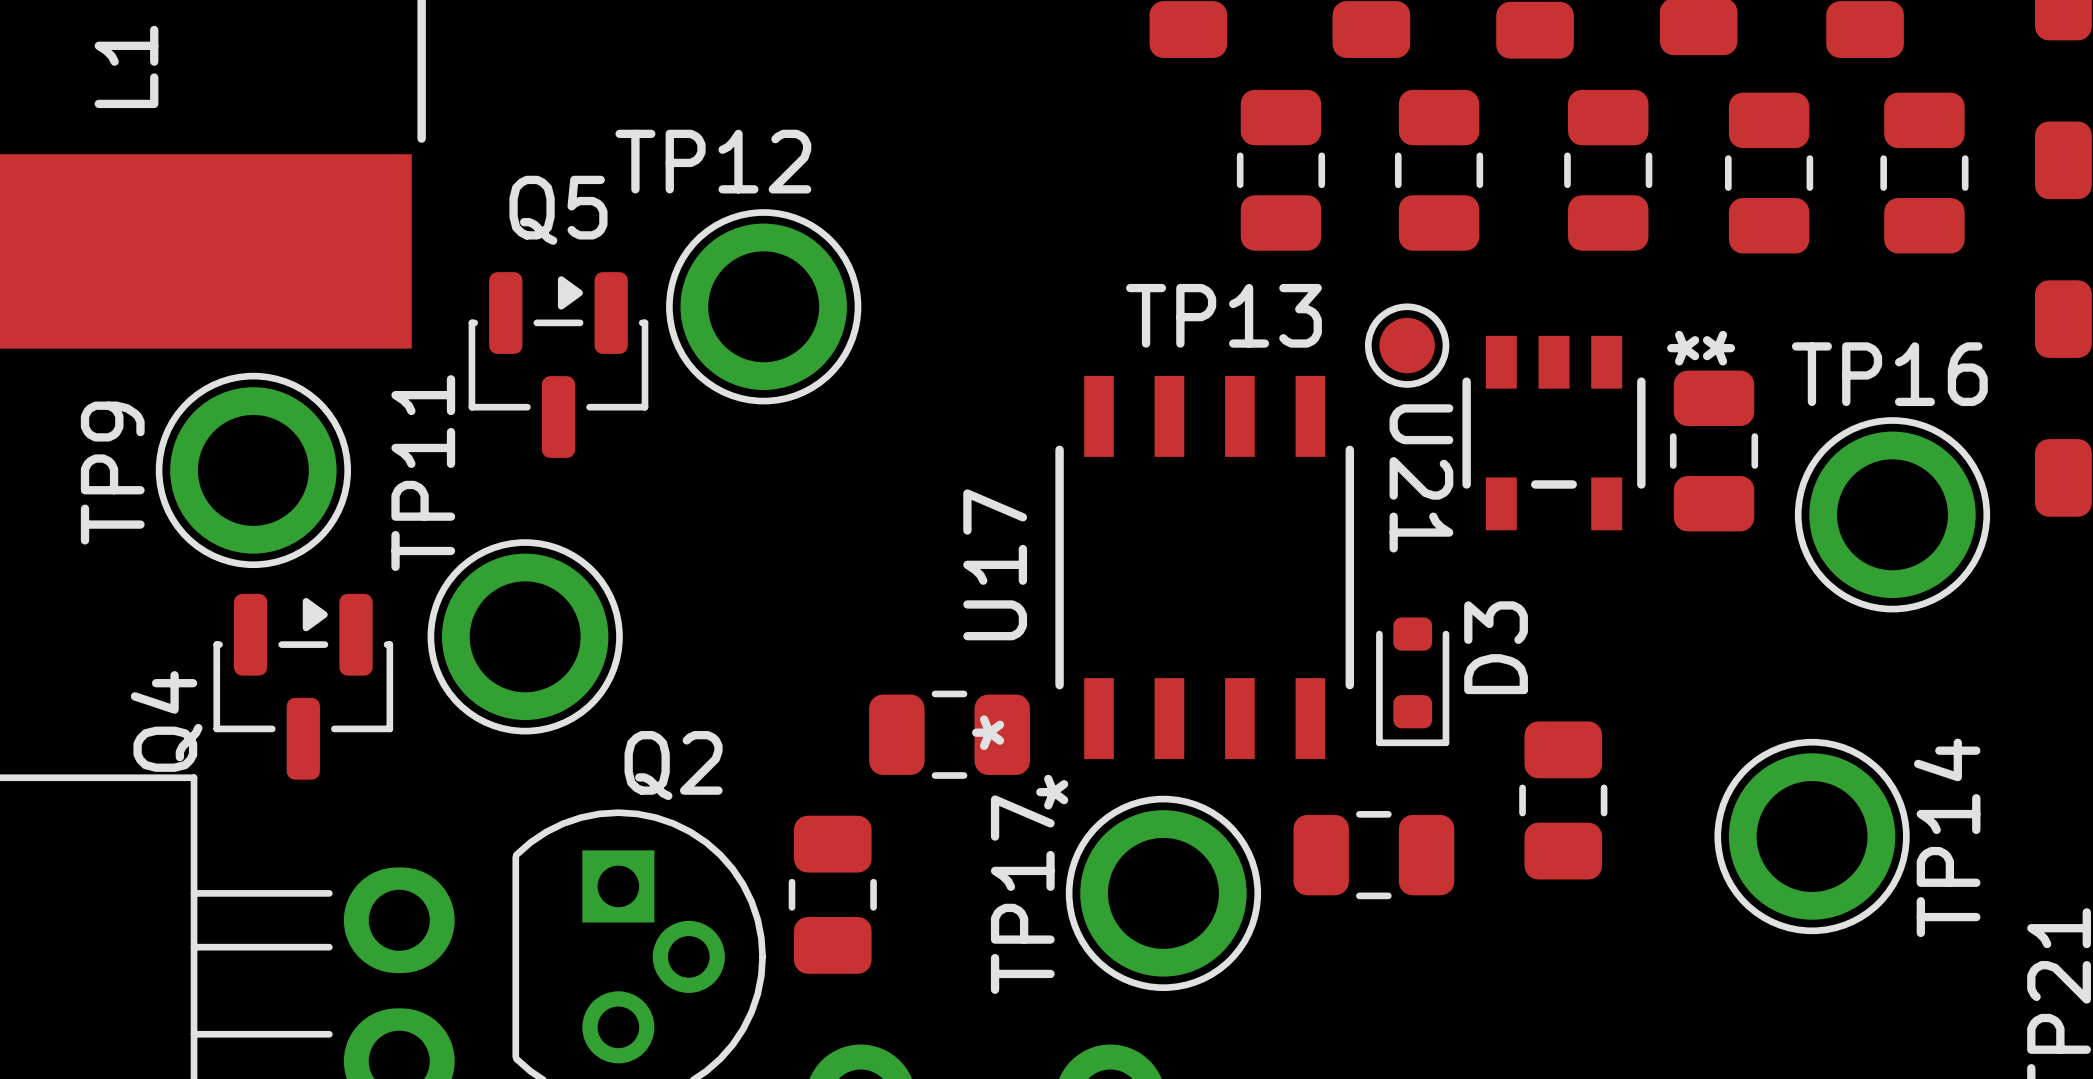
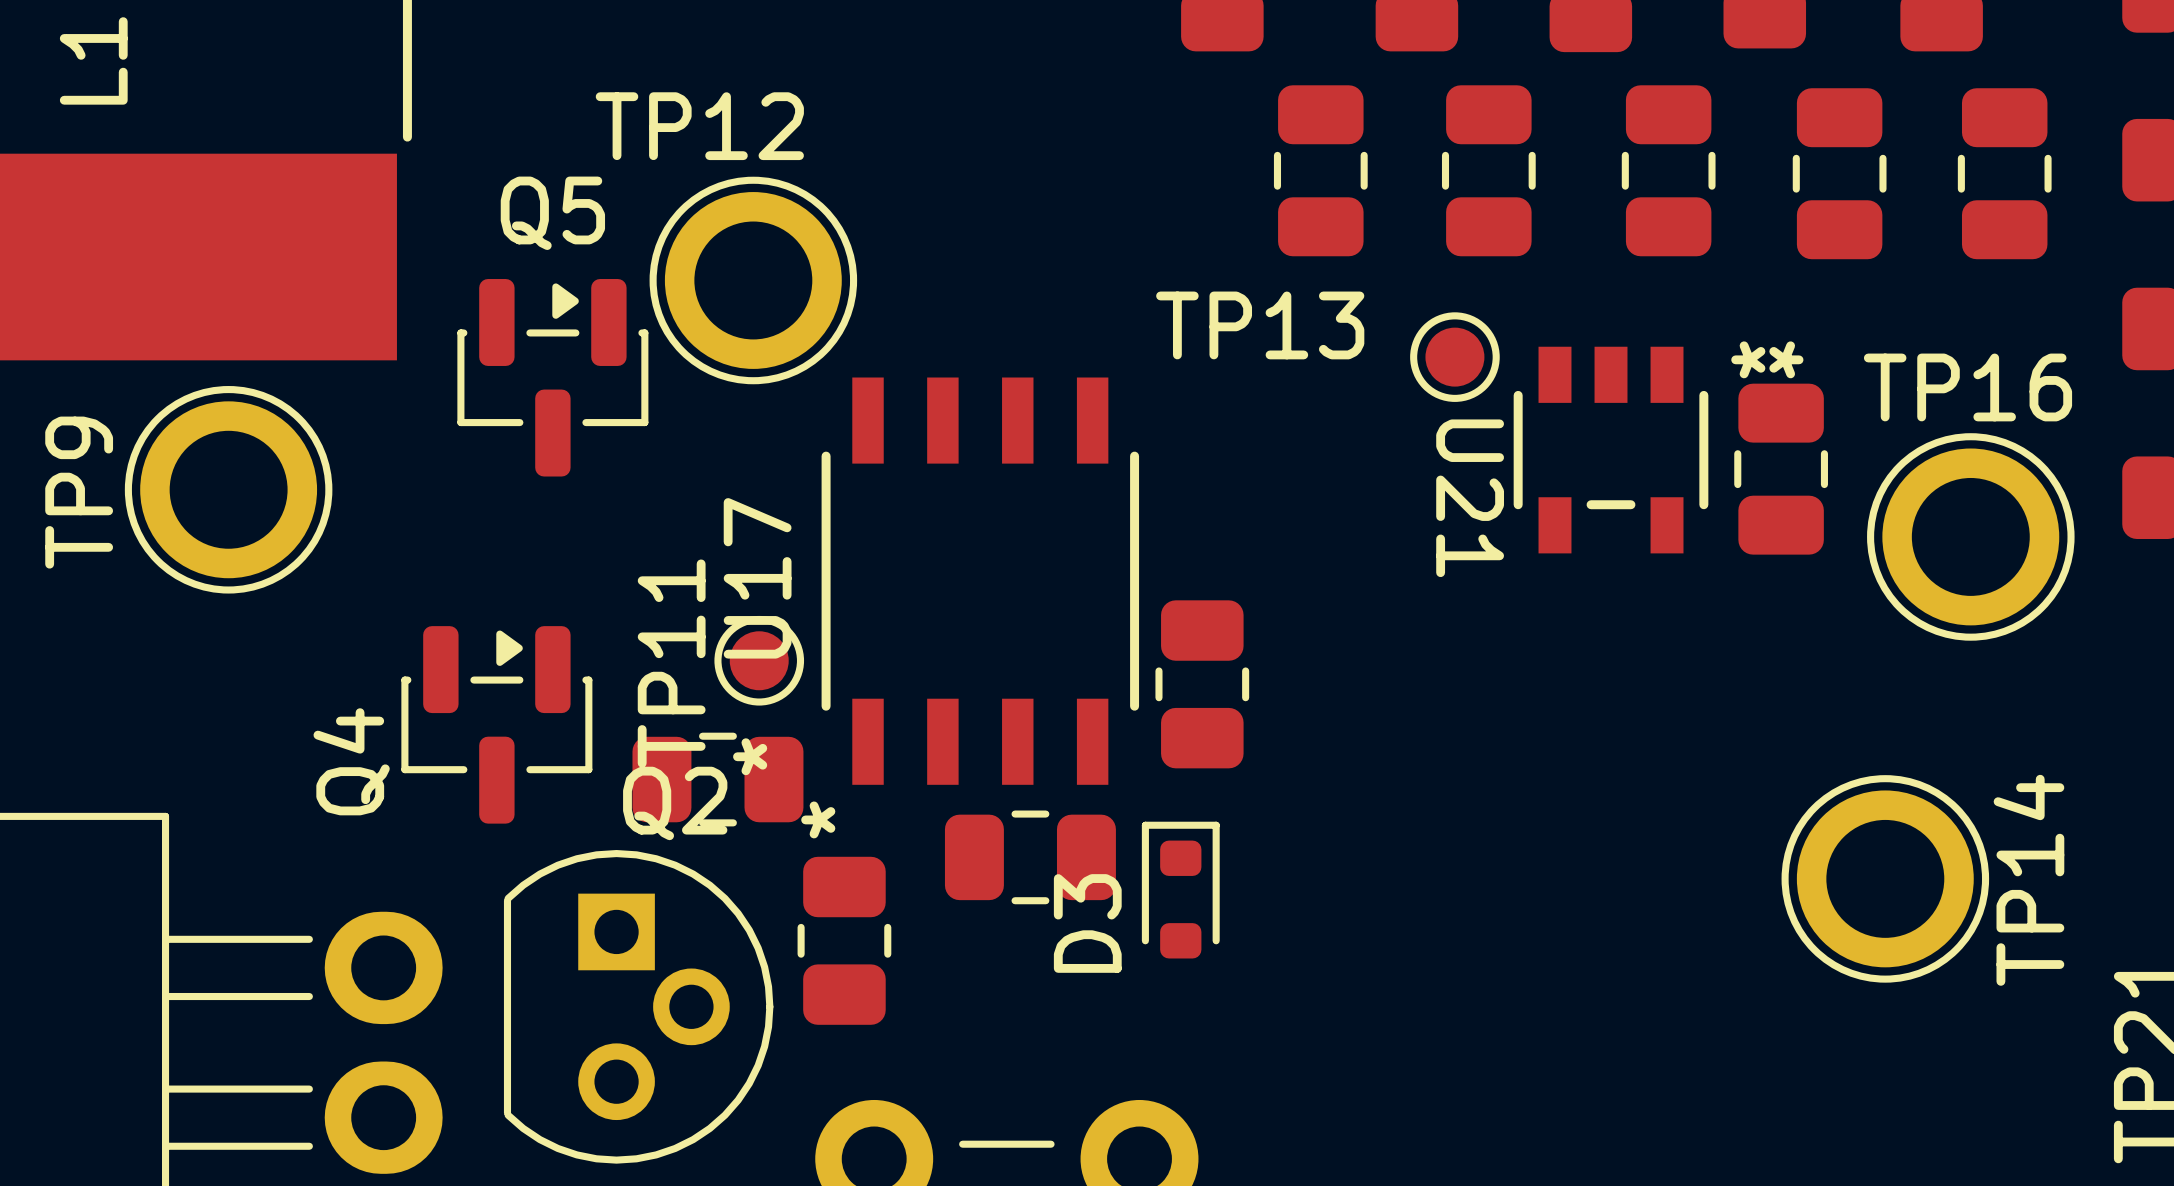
TP12 position: (763, 306) -> (753, 280)
TP11 name position: TP11 (423, 473) -> TP11 (671, 663)
TP11 footprint: [427, 539, 623, 735] -> [714, 615, 805, 706]
U17 position: (1204, 567) -> (980, 581)
D3 rotation: 0° (1412, 681) -> 180° (1180, 890)
D3 position: (1412, 681) -> (1180, 890)
Q4 position: (303, 686) -> (496, 724)
part position: (949, 734) -> (1030, 857)
part: none -> (717, 779)
part position: (1563, 800) -> (1202, 684)
part: (1373, 855) -> none
TP17: (1163, 893) -> none

